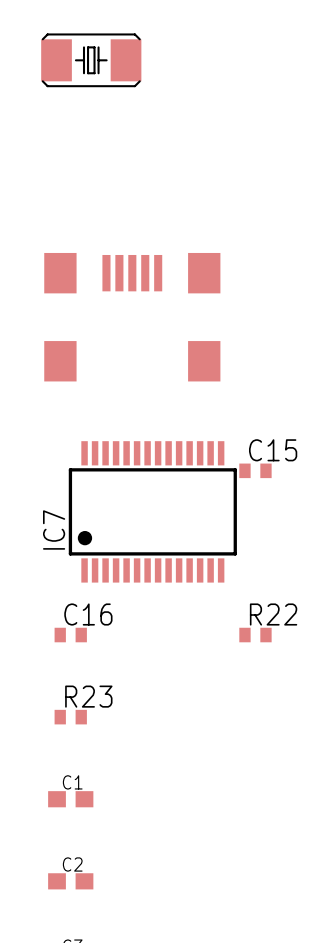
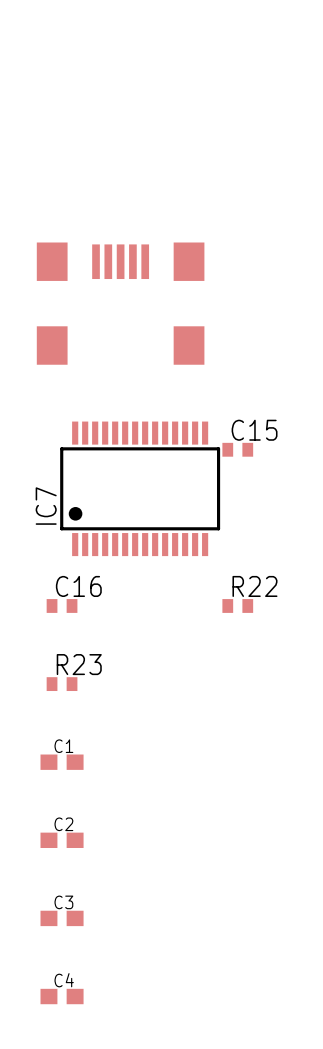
part: (91, 60) -> none

